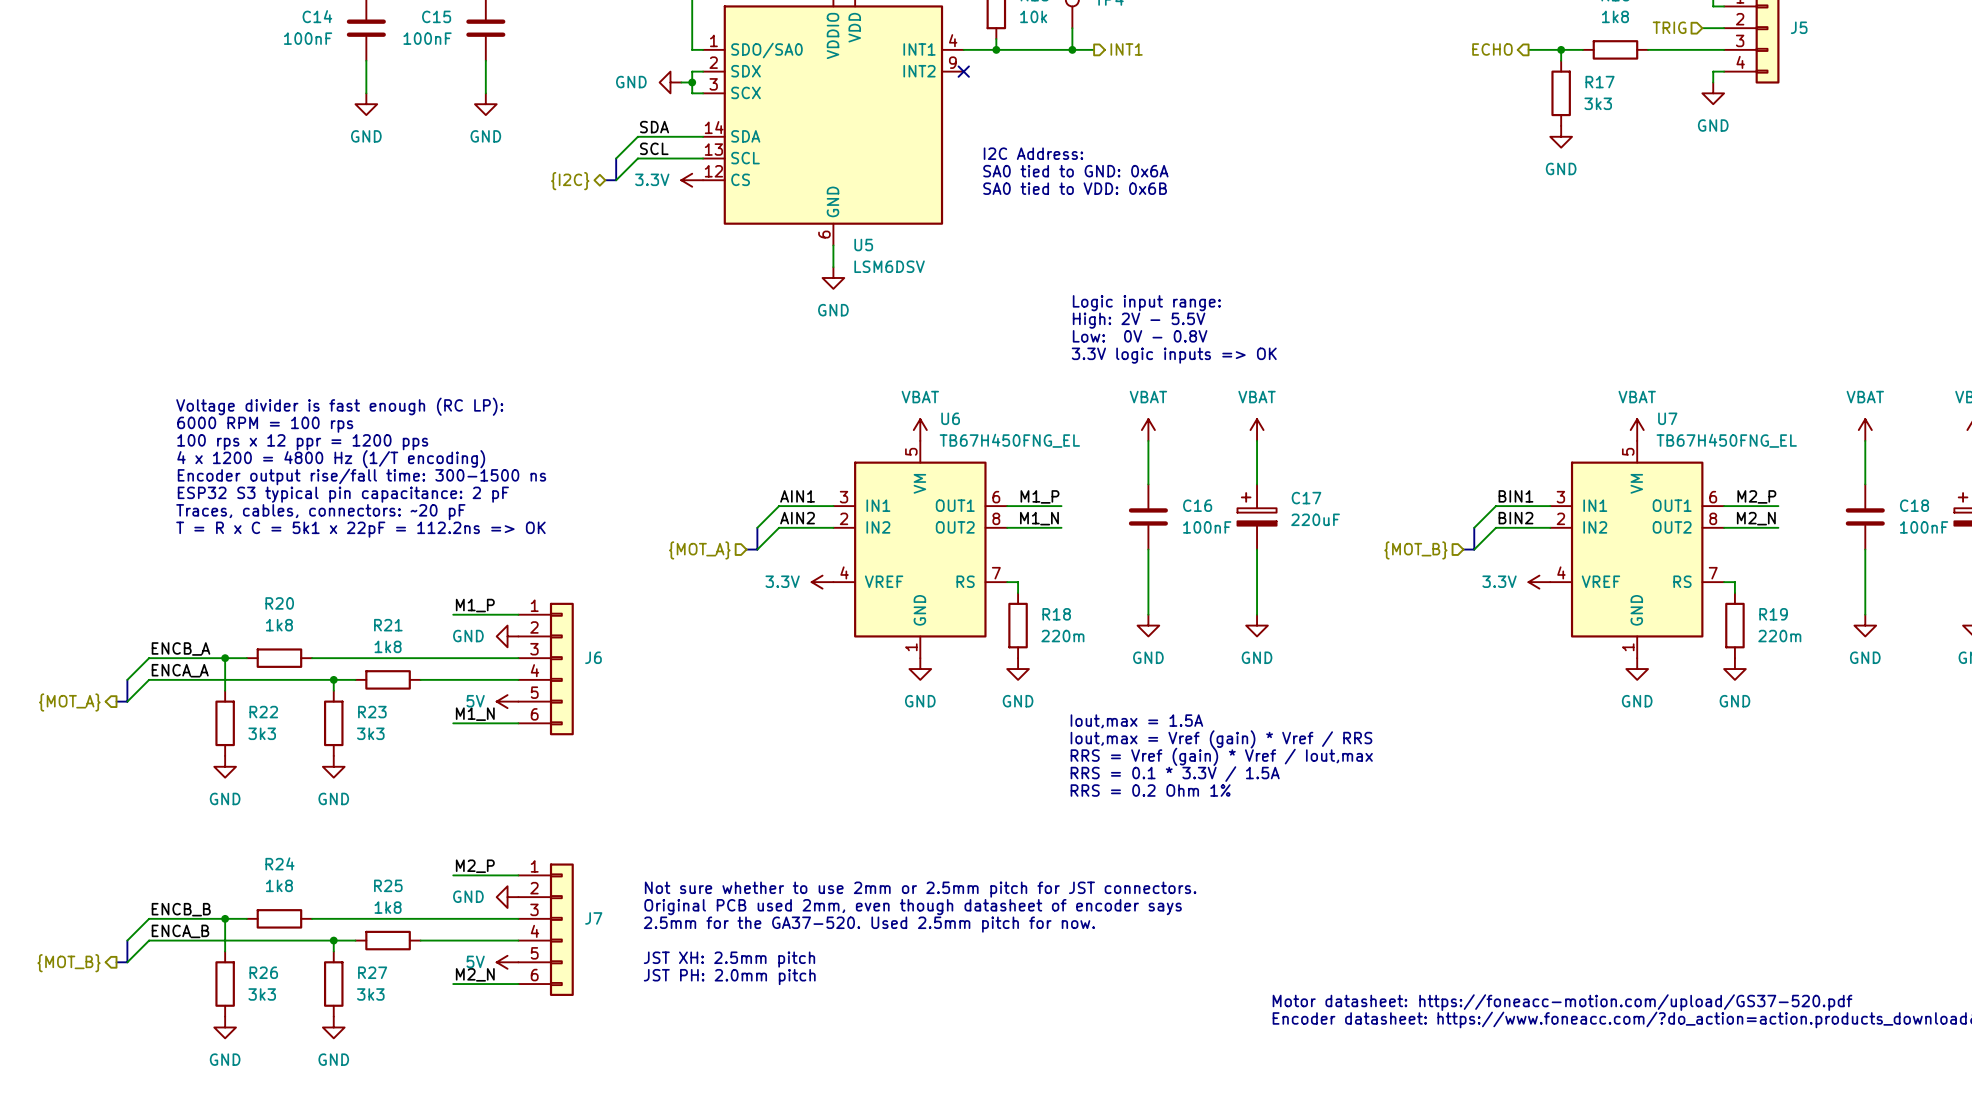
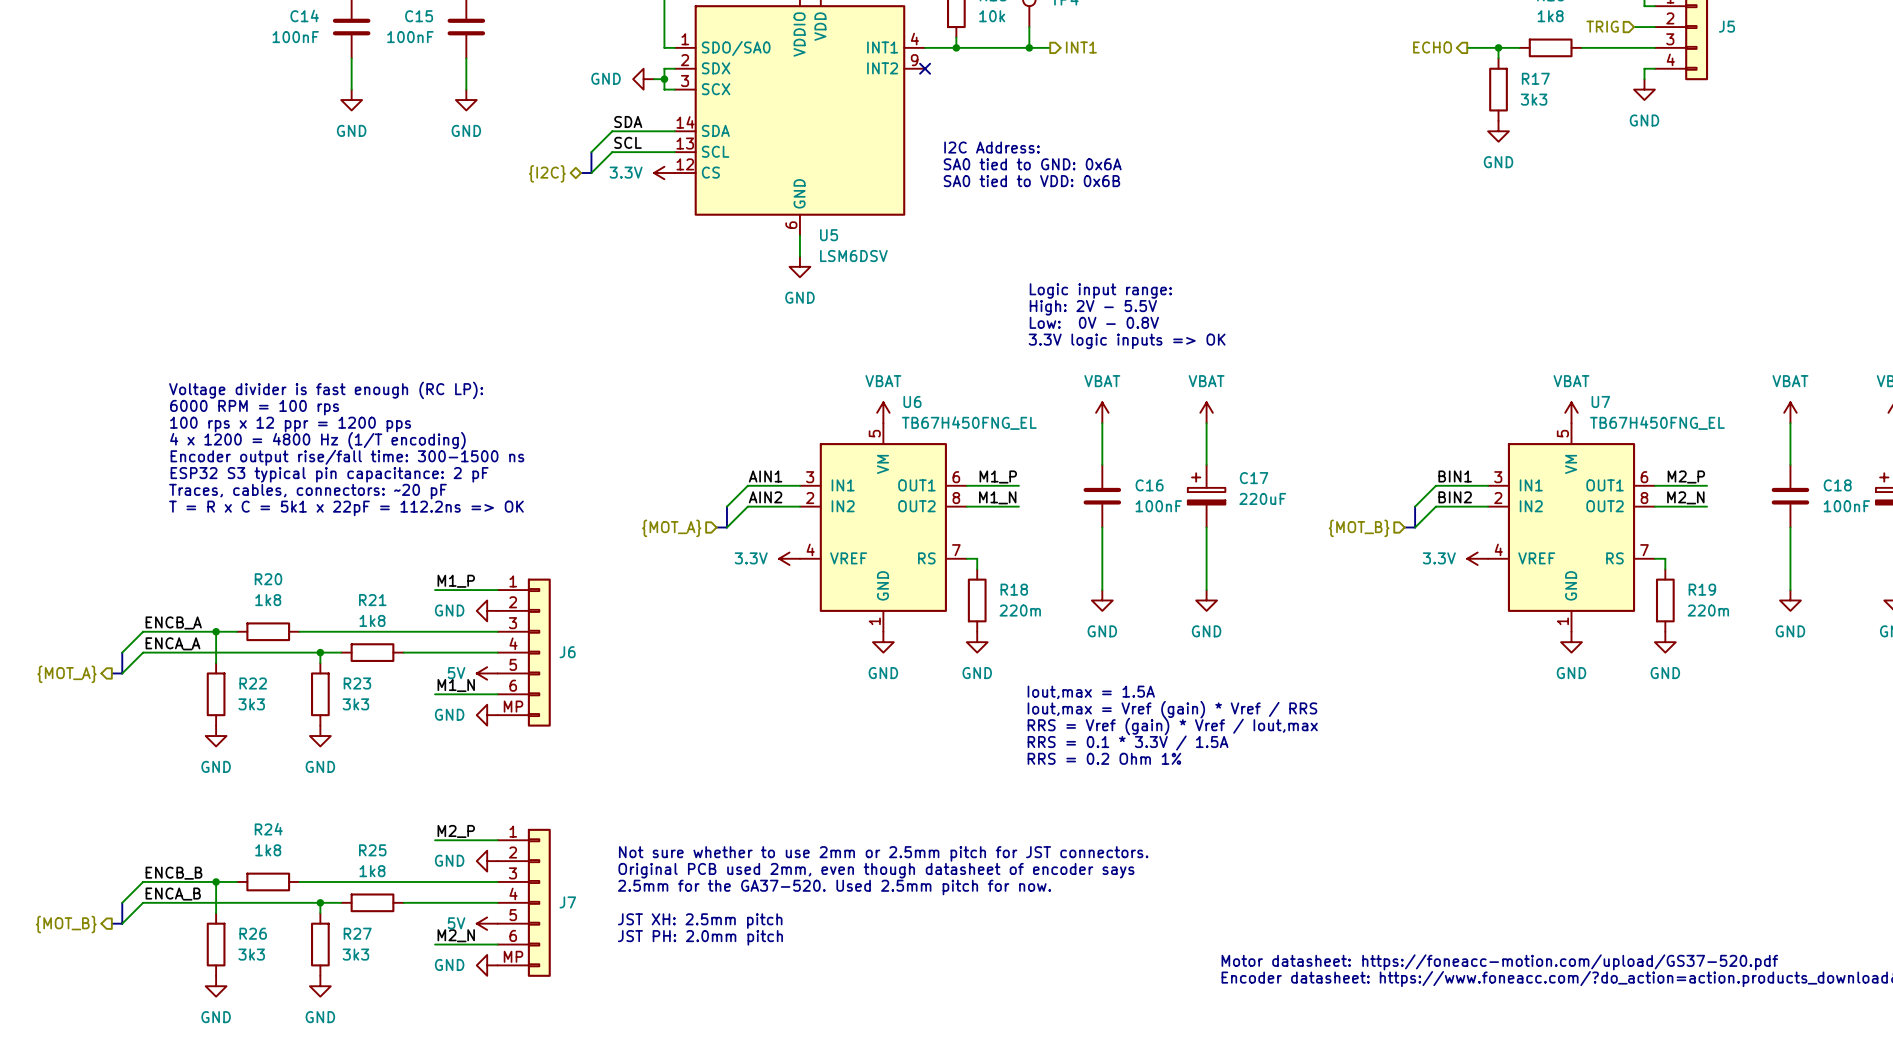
J6 symbol: [518, 602, 574, 736] -> [497, 578, 551, 727]
power symbol: none -> GND (487, 715)
J7 symbol: [518, 863, 574, 996] -> [497, 828, 551, 977]
power symbol: none -> GND (487, 965)

